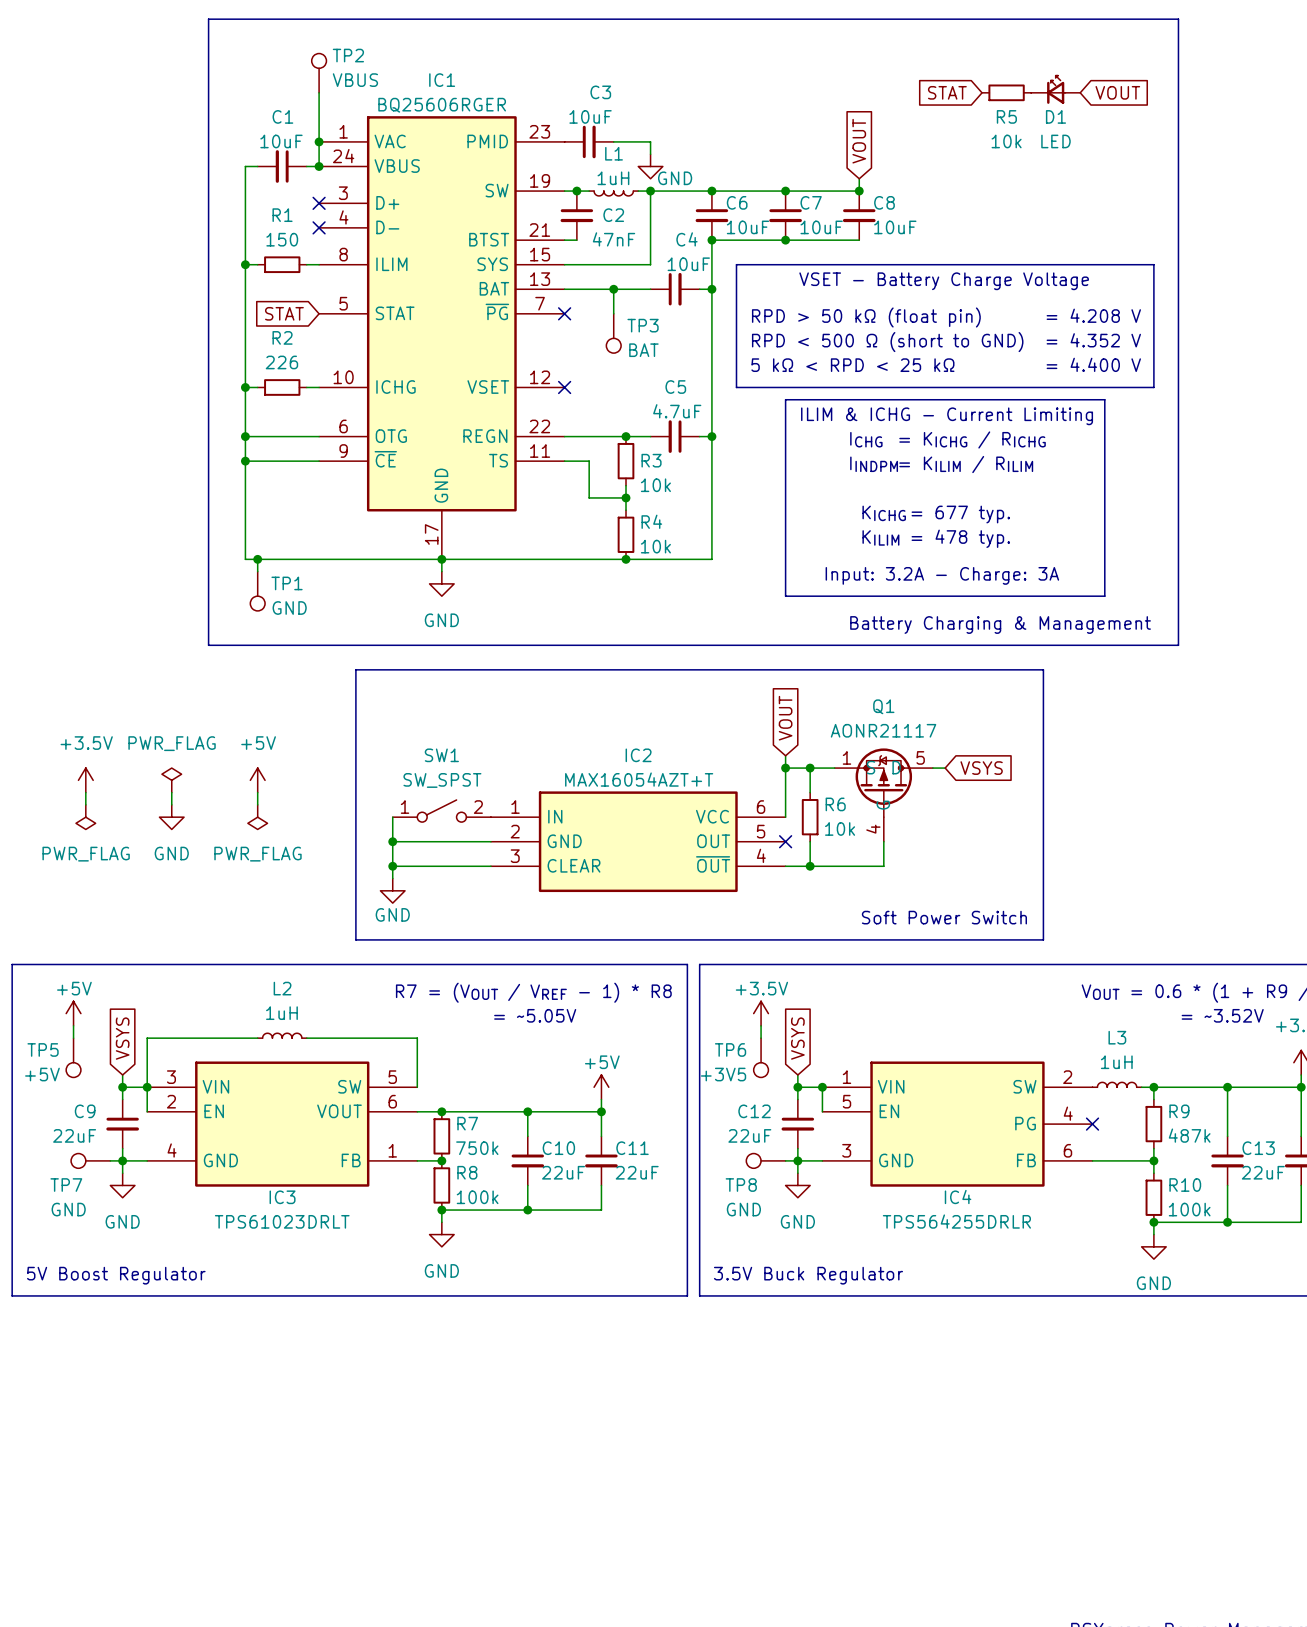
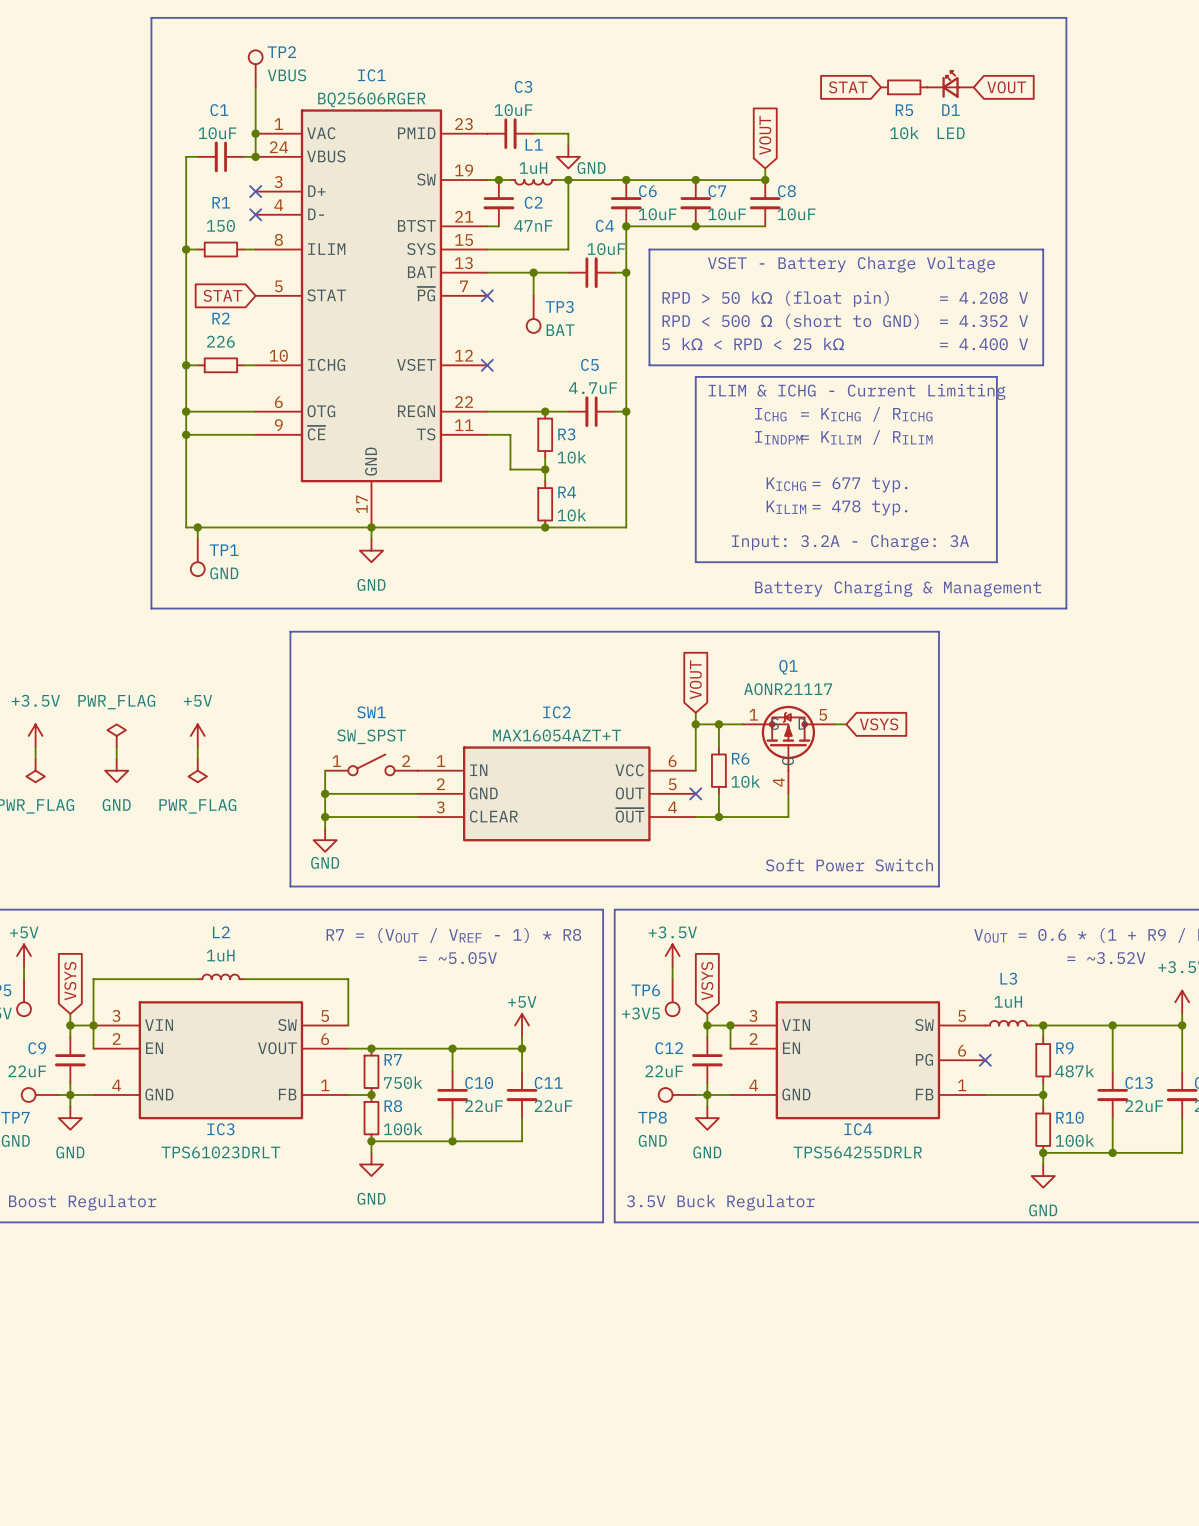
IC4 pin number: 1 (846, 1077) -> 3 (753, 1015)
IC4 pin number: 2 (1067, 1077) -> 5 (962, 1016)
IC4 pin number: 5 (846, 1101) -> 2 (753, 1039)
IC4 pin number: 4 (1068, 1113) -> 6 (962, 1050)
IC4 pin number: 3 (846, 1150) -> 4 (753, 1085)
IC4 pin number: 6 (1067, 1150) -> 1 (962, 1085)

